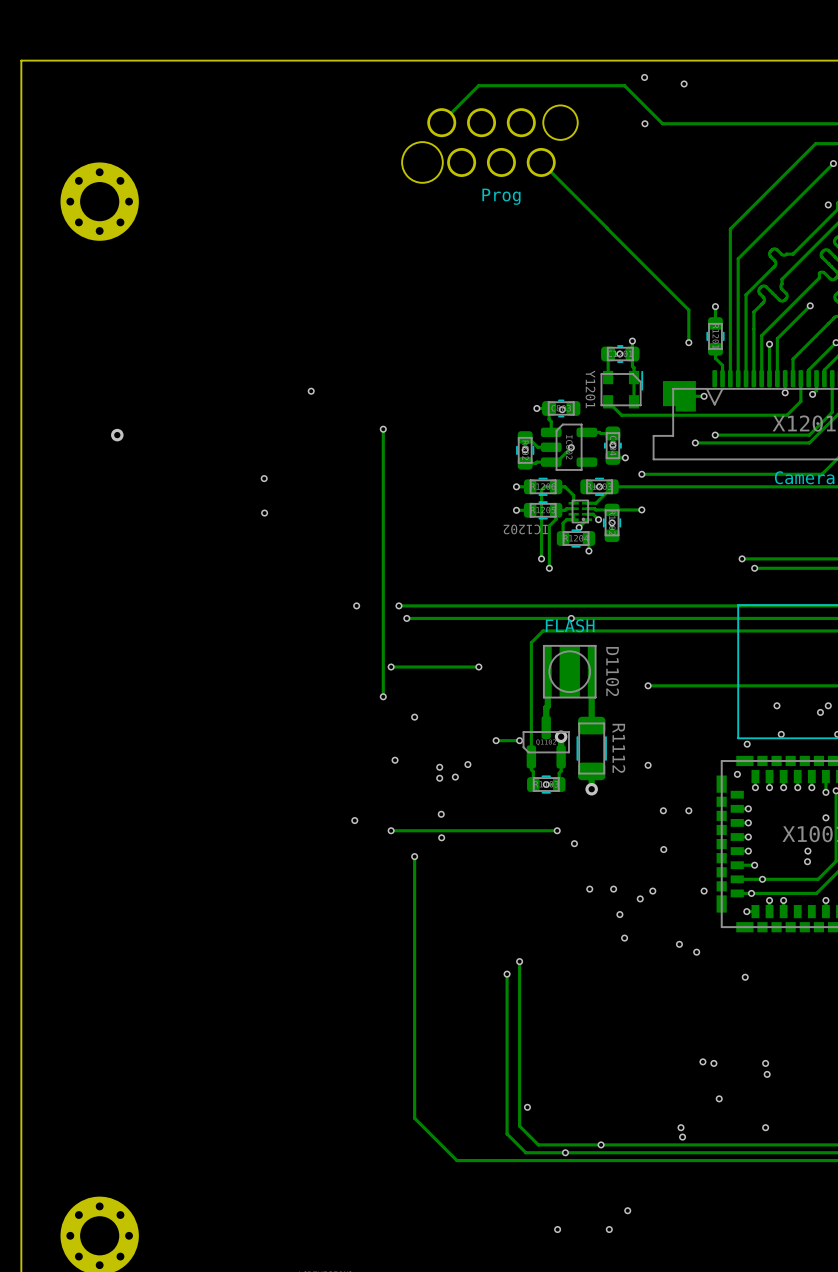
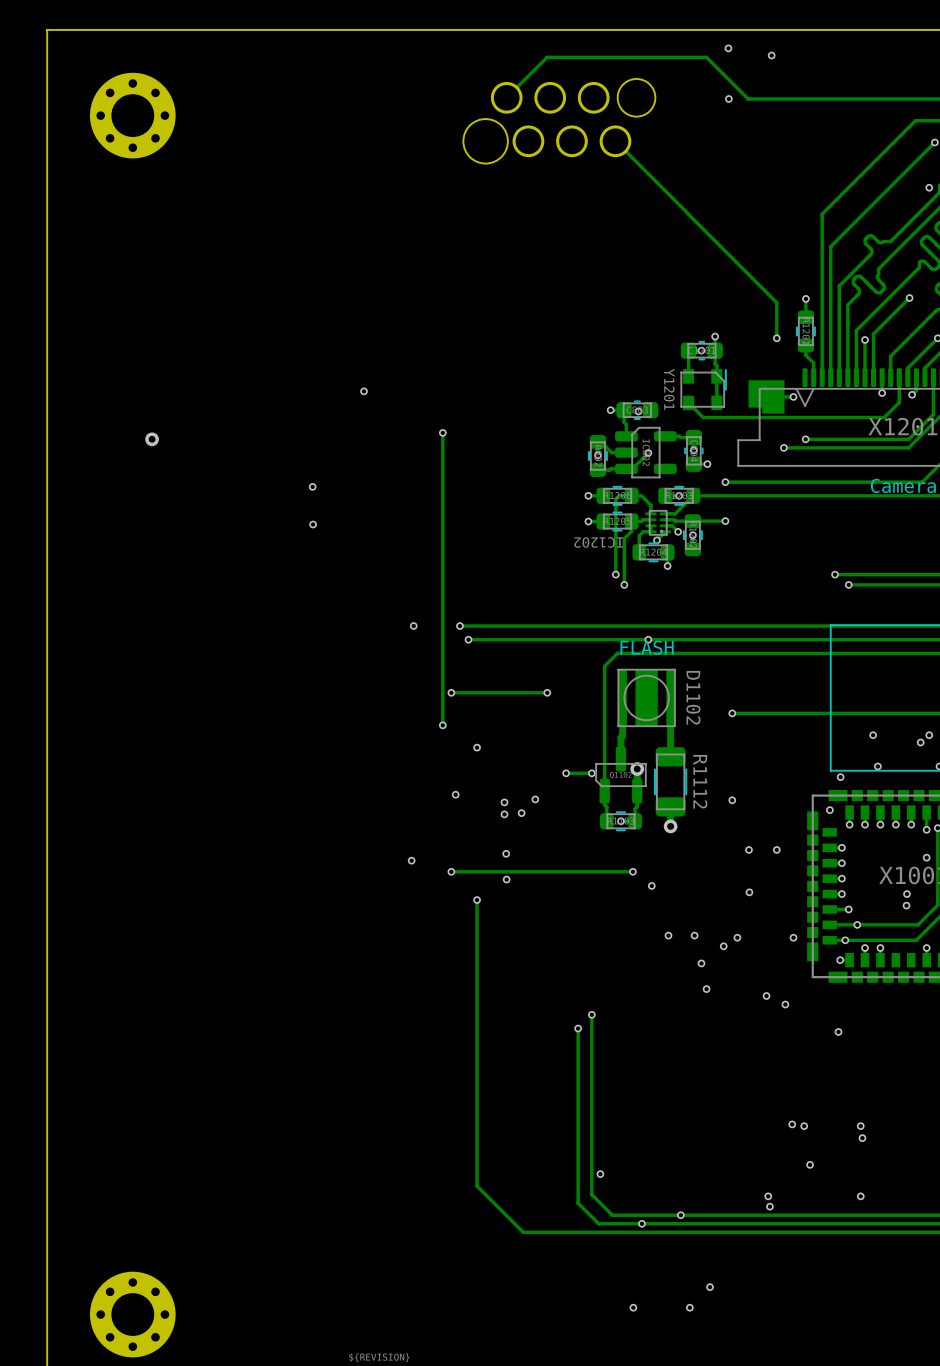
part value: Prog (501, 196) -> none
part position: (99, 201) -> (132, 115)

